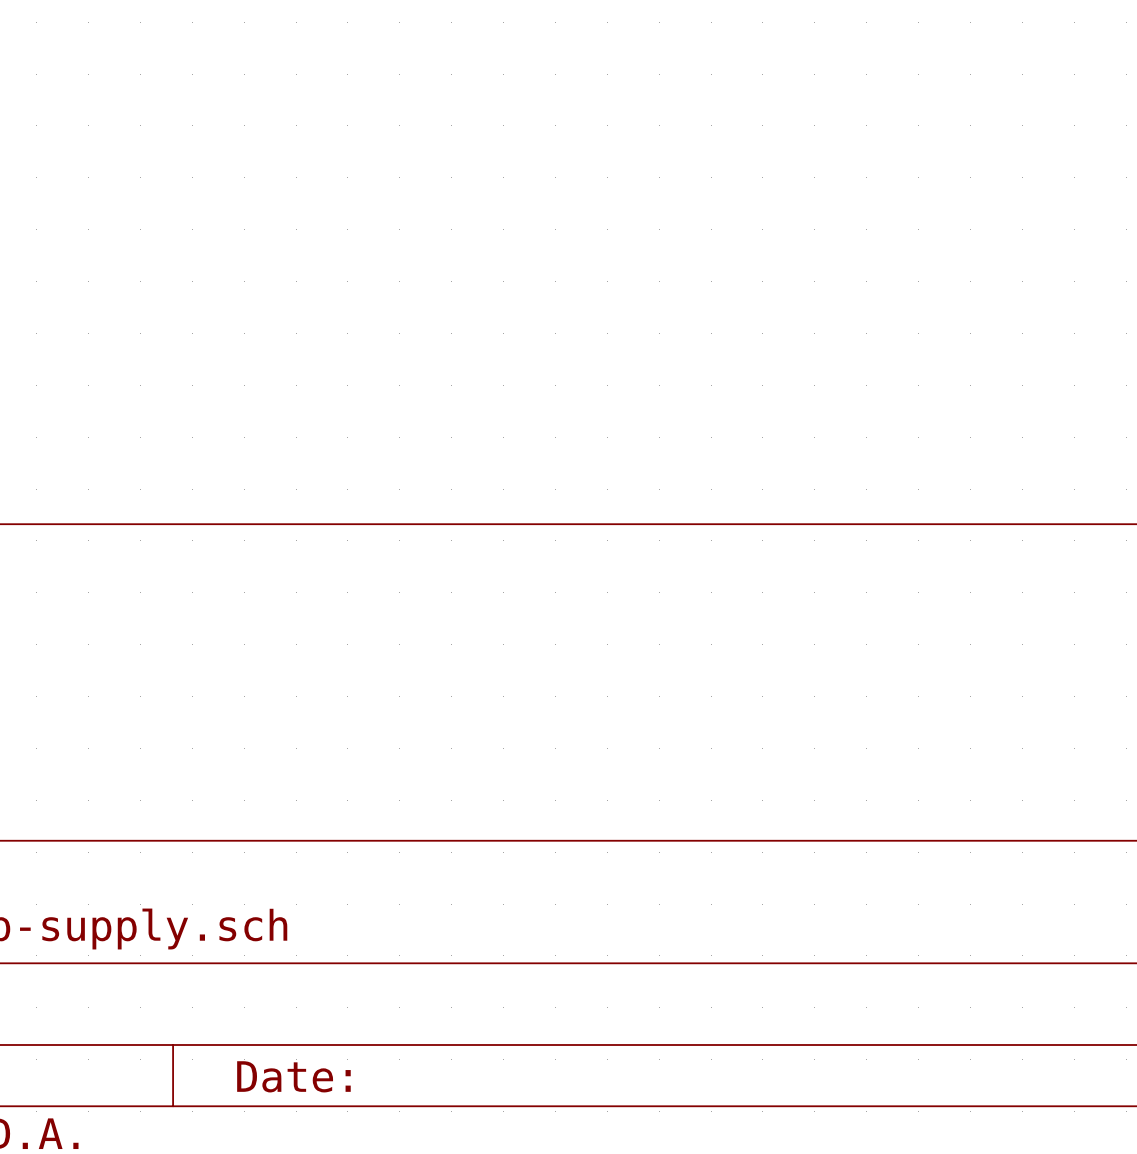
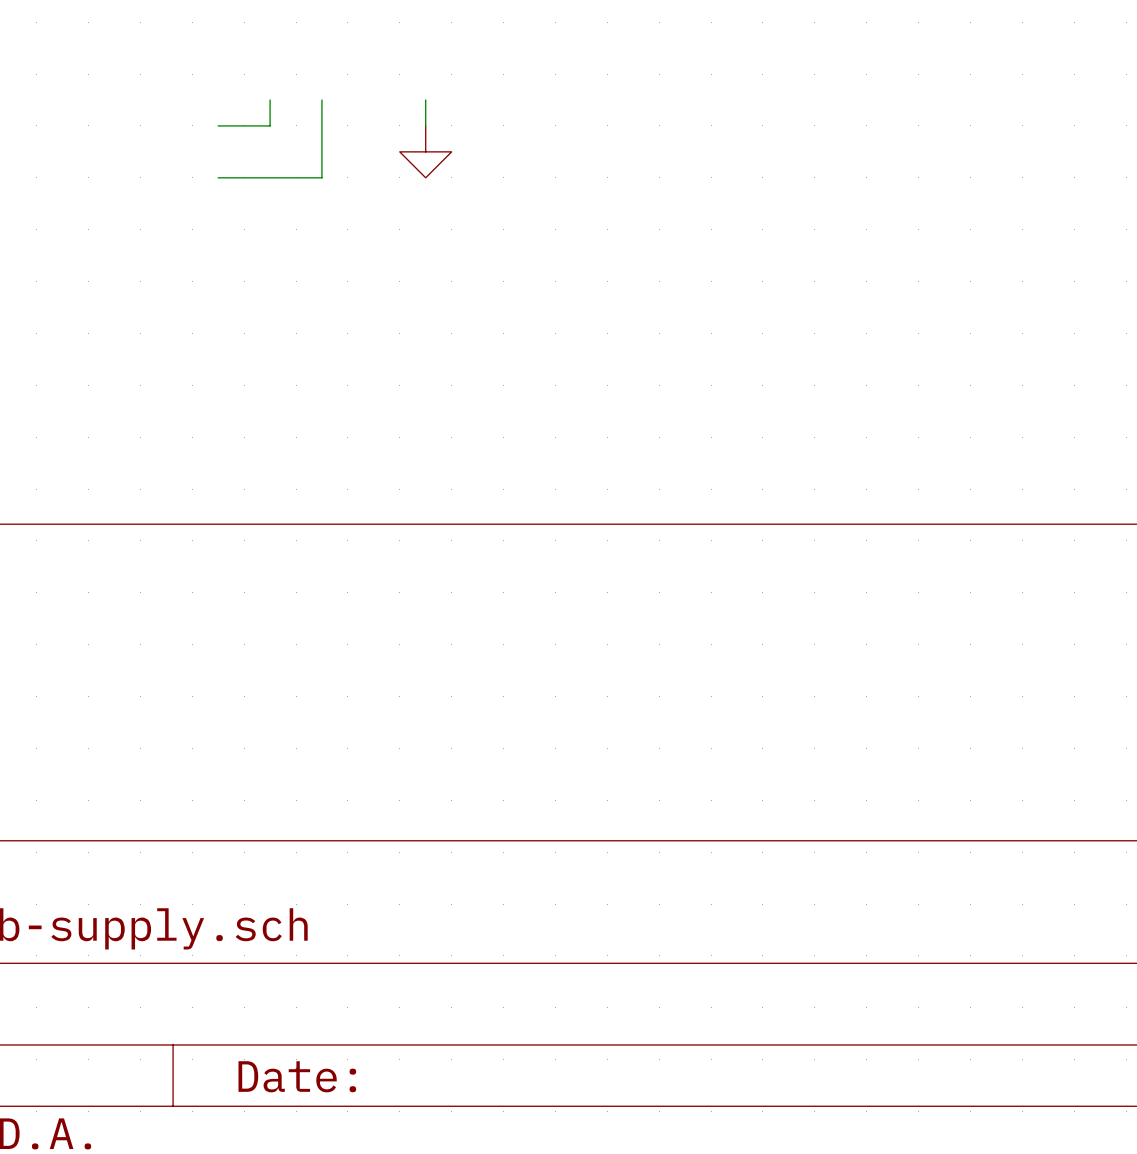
wire: none -> (270, 100) (270, 125) (218, 125)
wire: none -> (321, 100) (321, 177) (218, 177)
wire: none -> (425, 100) (425, 125)
power symbol: none -> (425, 151)

